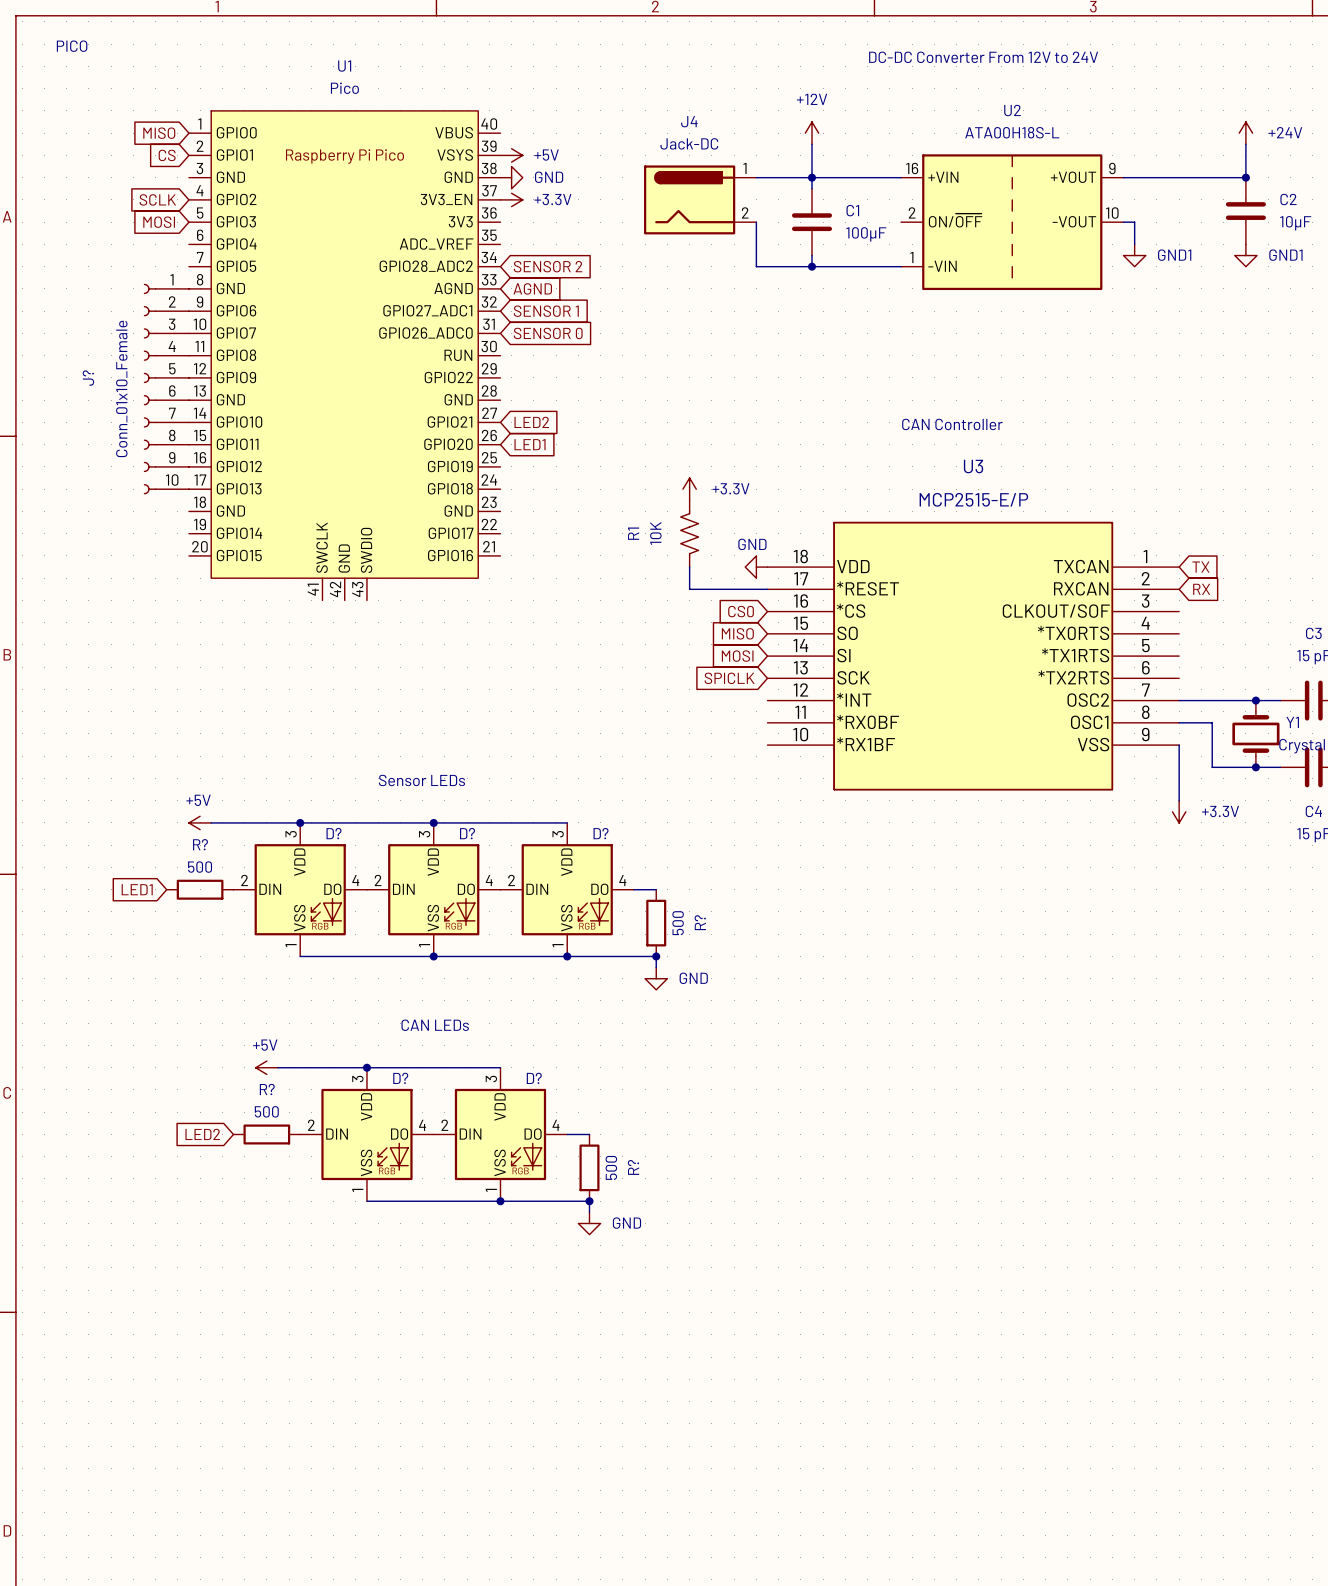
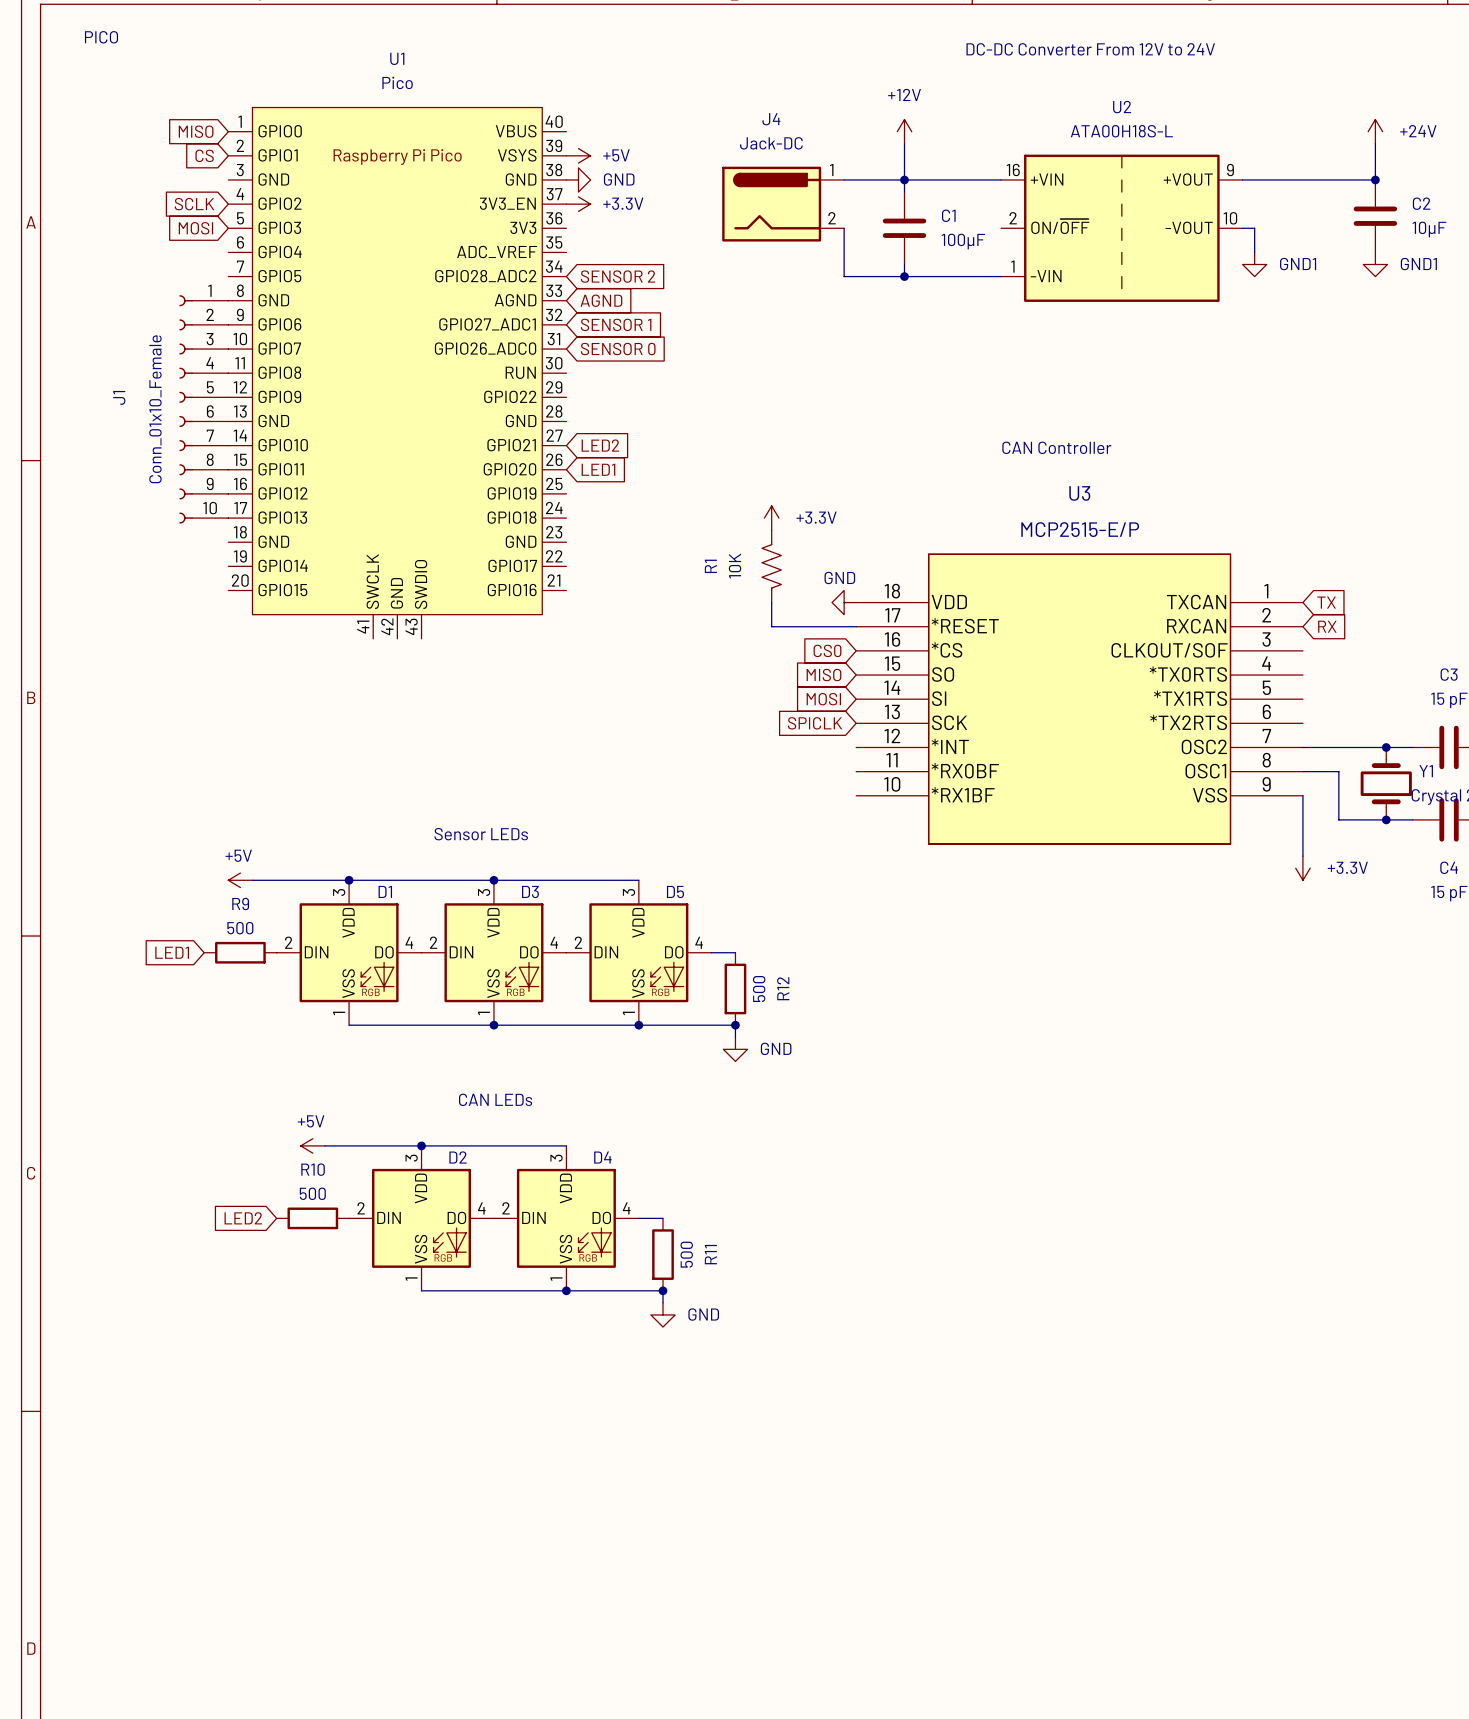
J? name: J? (88, 378) -> J1 (119, 397)
D? name: D? (334, 833) -> D1 (385, 891)
D? name: D? (467, 833) -> D3 (530, 891)
D? name: D? (601, 833) -> D5 (675, 891)
R? name: R? (200, 844) -> R9 (240, 904)
R? name: R? (700, 922) -> R12 (783, 988)
D? name: D? (400, 1078) -> D2 (458, 1157)
D? name: D? (534, 1078) -> D4 (602, 1157)
R? name: R? (267, 1089) -> R10 (313, 1169)
R? name: R? (633, 1167) -> R11 (710, 1254)

